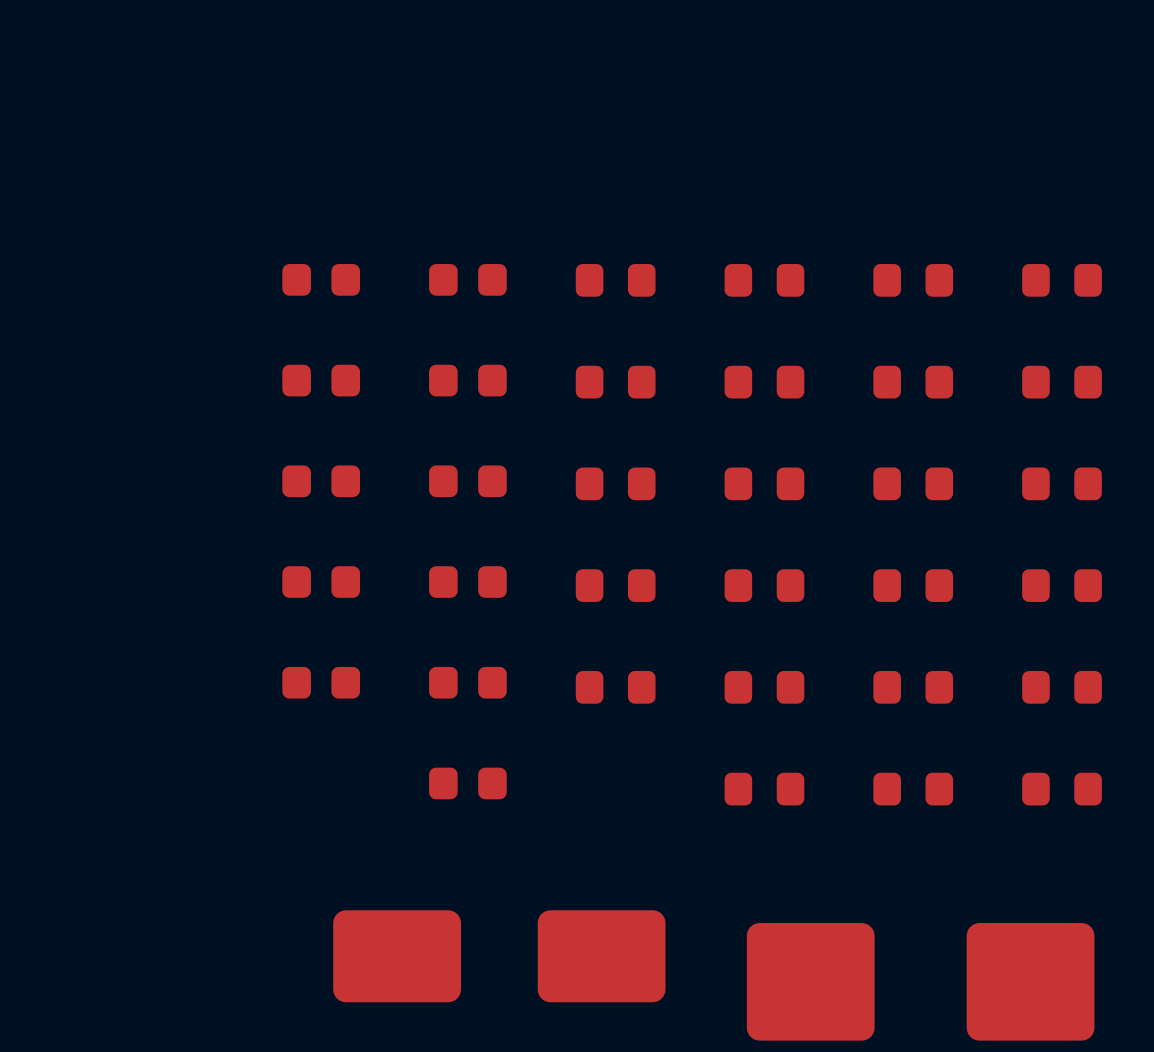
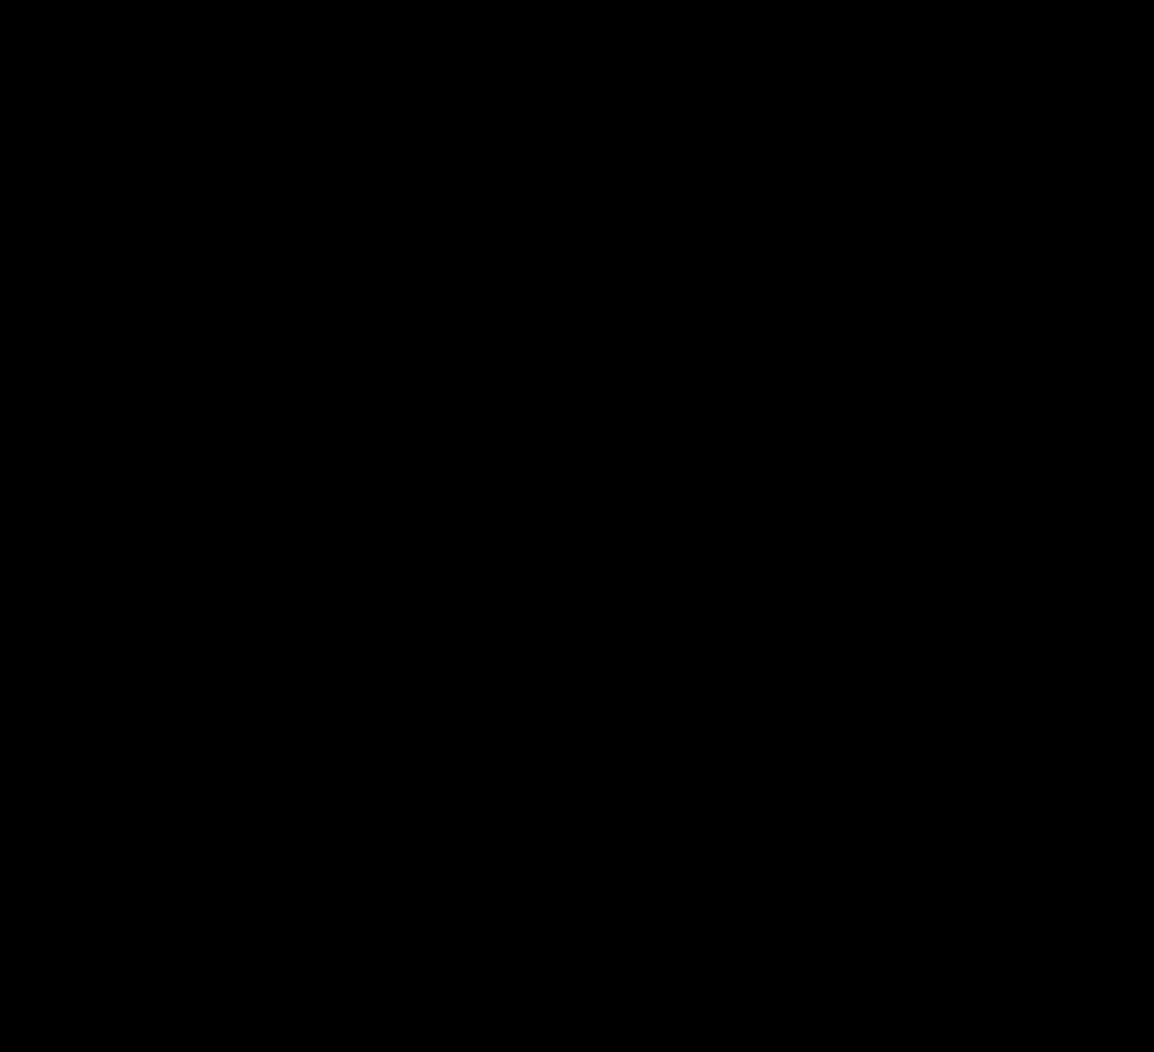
part: (321, 279) -> none
part: (467, 279) -> none
part: (615, 280) -> none
part: (764, 280) -> none
part: (913, 280) -> none
part: (1062, 280) -> none
part: (321, 380) -> none
part: (467, 380) -> none
part: (615, 382) -> none
part: (764, 382) -> none
part: (913, 382) -> none
part: (1062, 382) -> none
part: (321, 481) -> none
part: (467, 481) -> none
part: (615, 483) -> none
part: (764, 483) -> none
part: (913, 483) -> none
part: (1062, 483) -> none
part: (321, 582) -> none
part: (467, 582) -> none
part: (615, 585) -> none
part: (764, 585) -> none
part: (913, 585) -> none
part: (1062, 585) -> none
part: (321, 682) -> none
part: (467, 682) -> none
part: (615, 687) -> none
part: (764, 687) -> none
part: (913, 687) -> none
part: (1062, 687) -> none
part: (467, 783) -> none
part: (764, 789) -> none
part: (913, 789) -> none
part: (1062, 789) -> none
part: (499, 956) -> none
part: (920, 981) -> none

